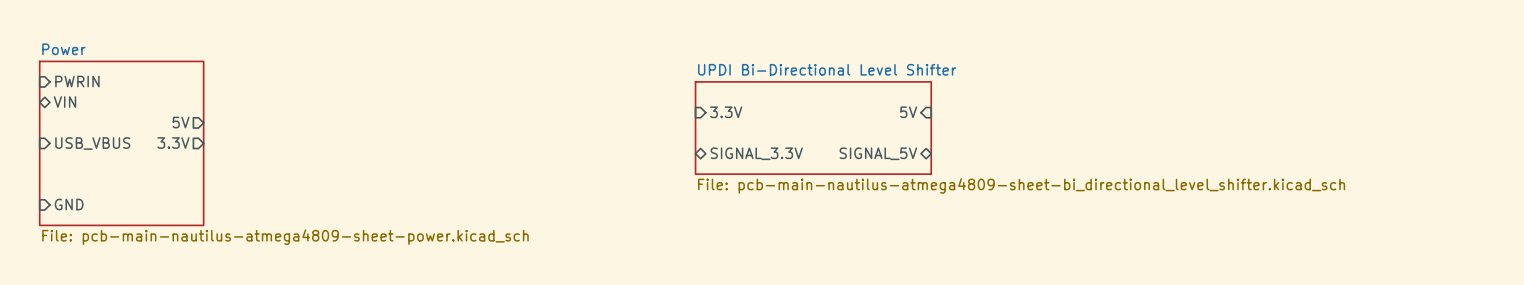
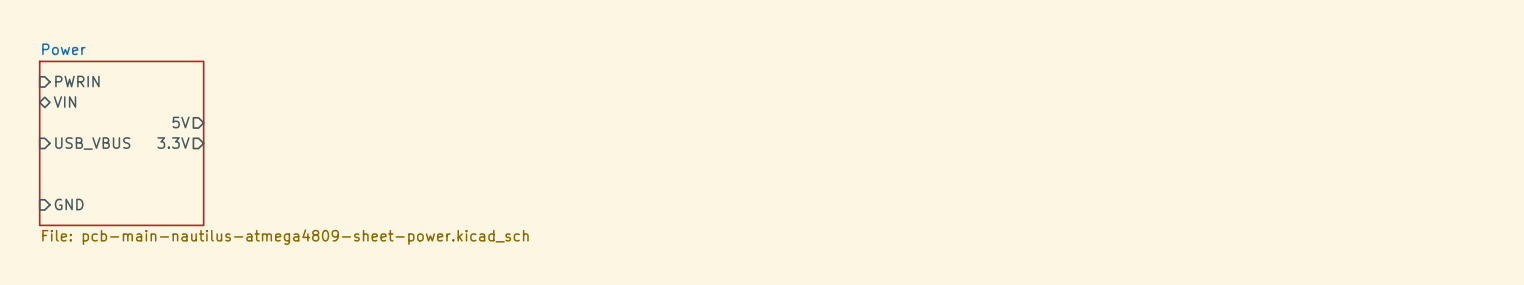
sheet pin: 3.3V (726, 112) -> none
sheet pin: 5V (908, 112) -> none
sheet UPDI Bi-Directional Level Shifter: File: pcb-main-nautilus-atmega4809-sheet-bi_directional_level_shifter.kicad_sch (813, 128) -> none
sheet pin: SIGNAL_3.3V (756, 153) -> none
sheet pin: SIGNAL_5V (878, 153) -> none

